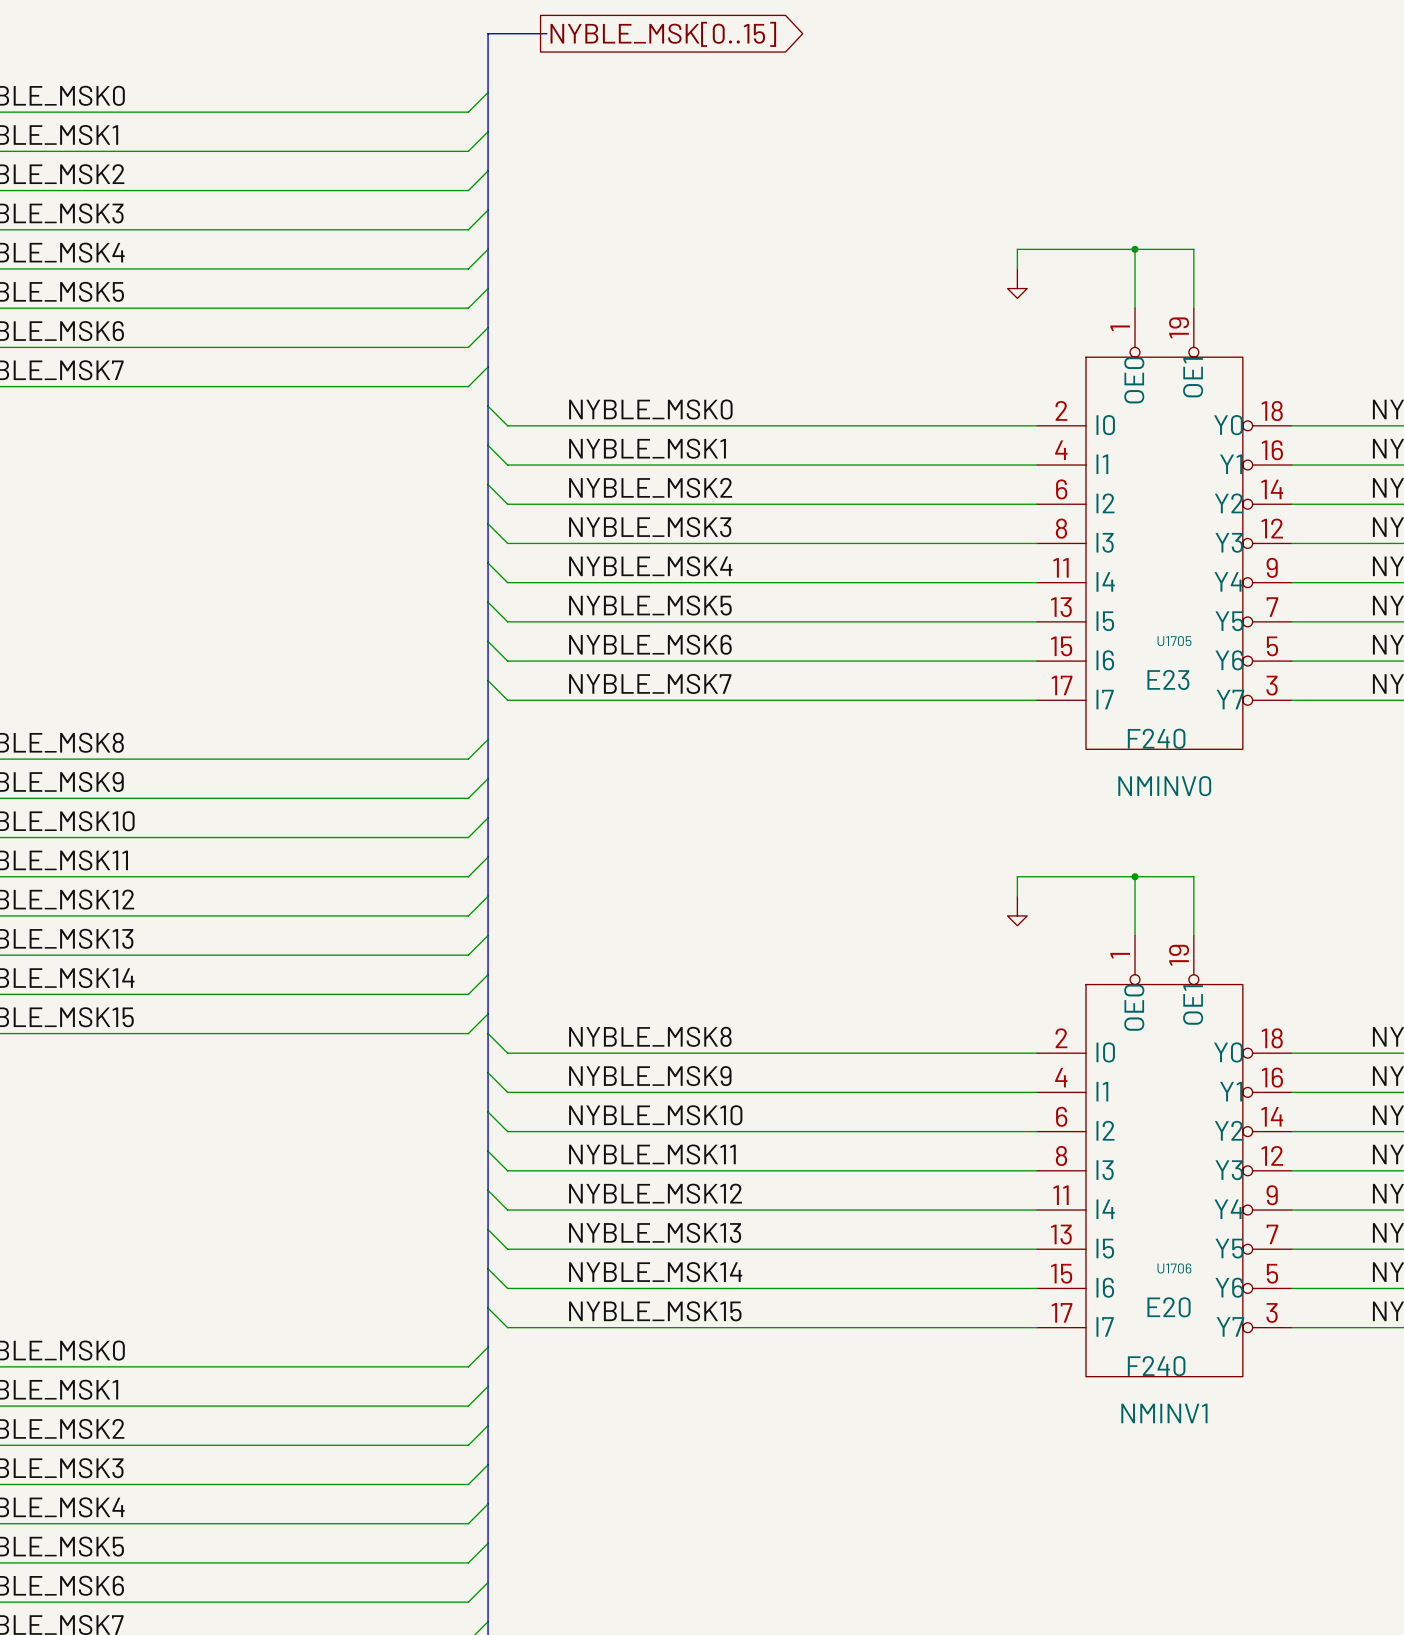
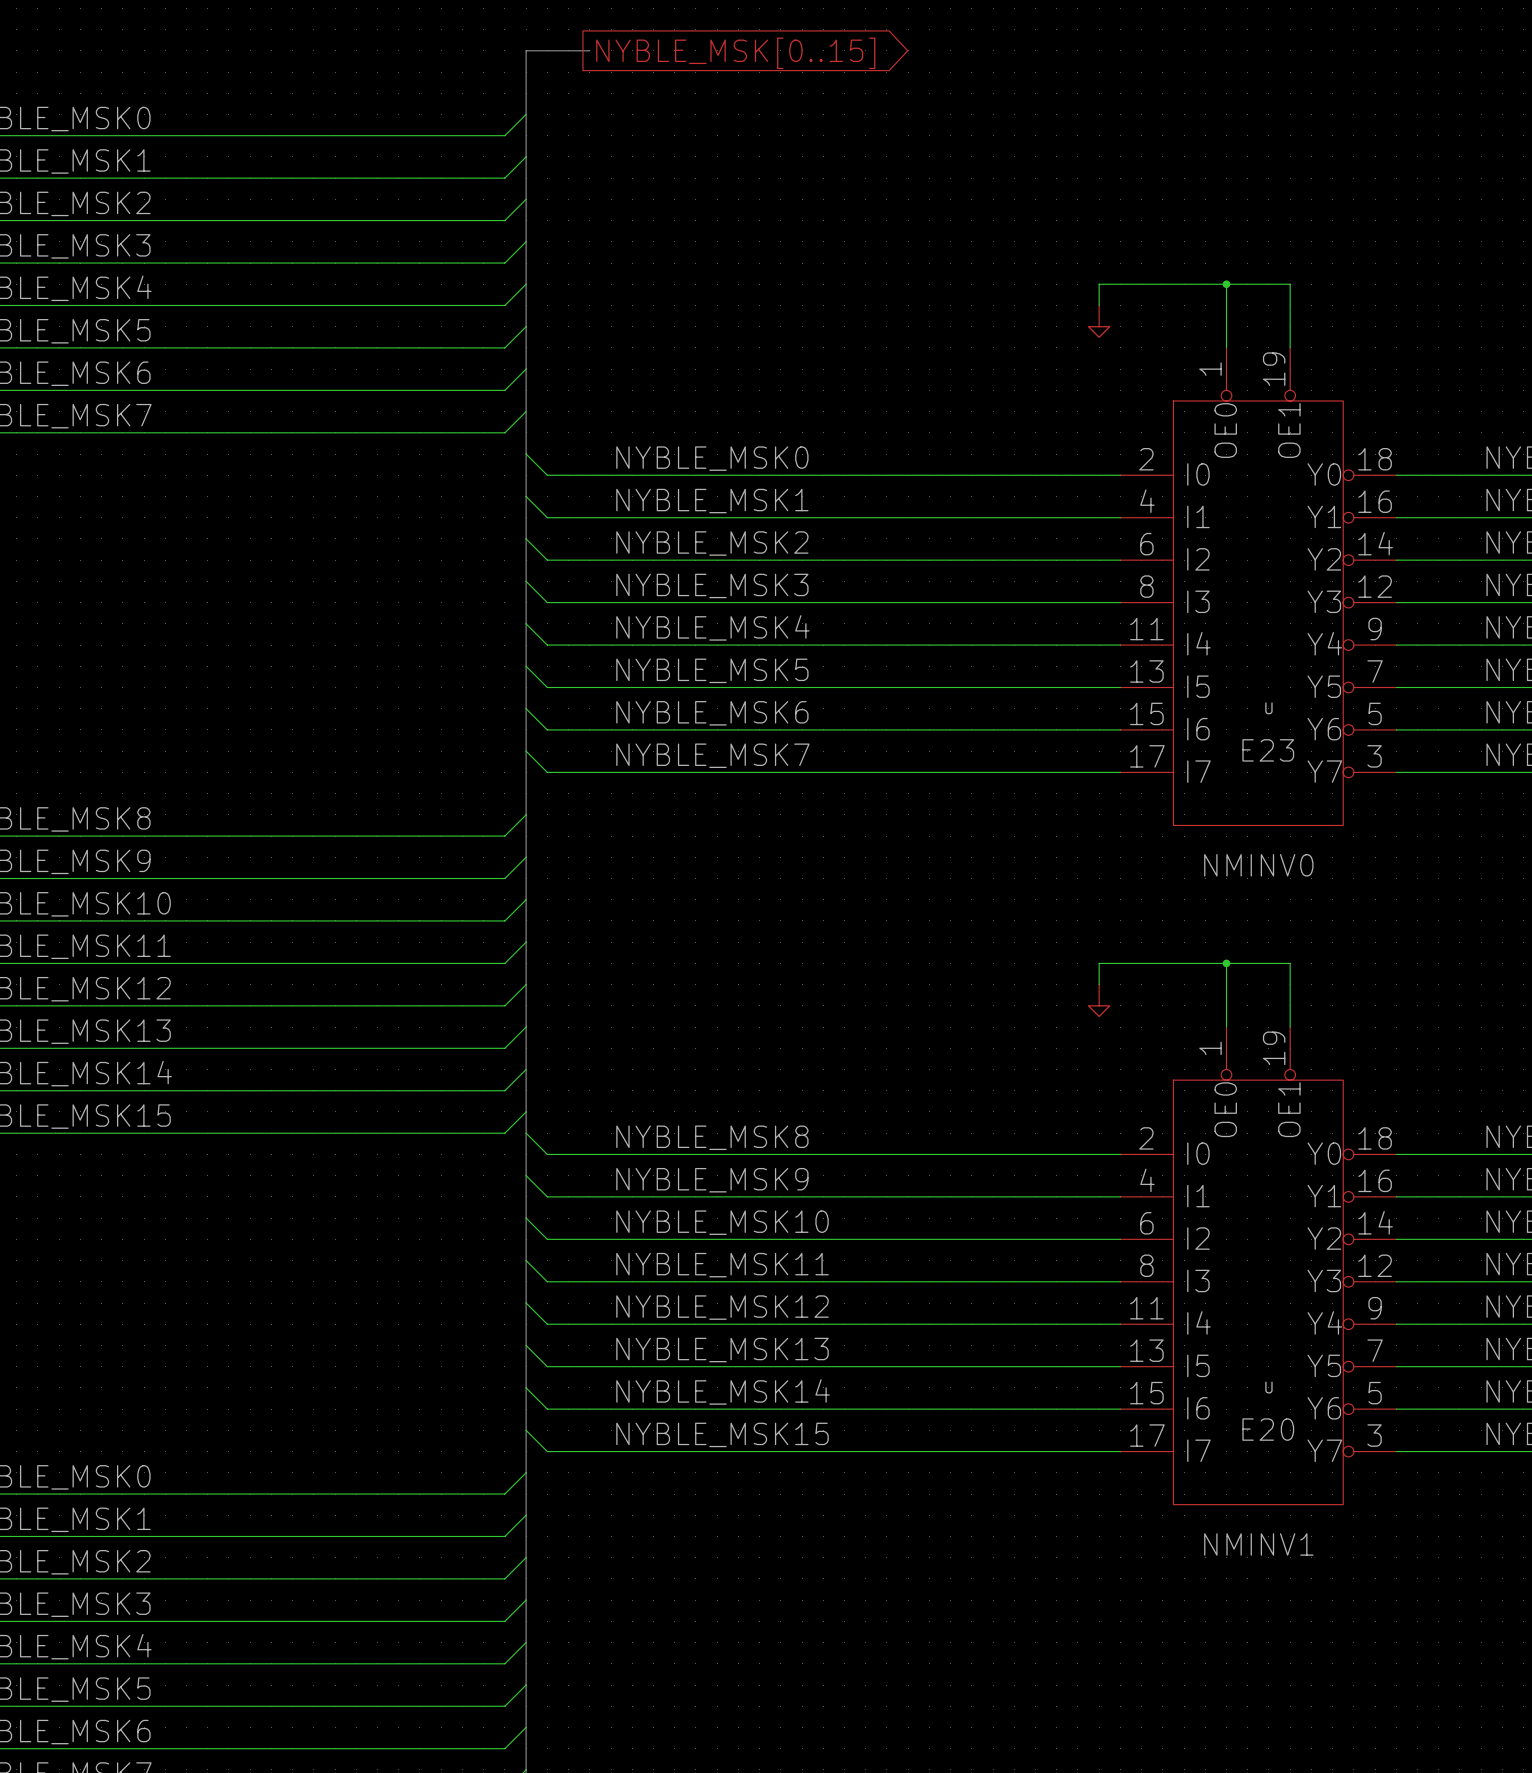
U1705 name: U1705 (1174, 641) -> U (1268, 708)
U1705 value: F240 (1156, 738) -> none
U1706 name: U1706 (1174, 1268) -> U (1268, 1387)
U1706 value: F240 (1156, 1366) -> none

